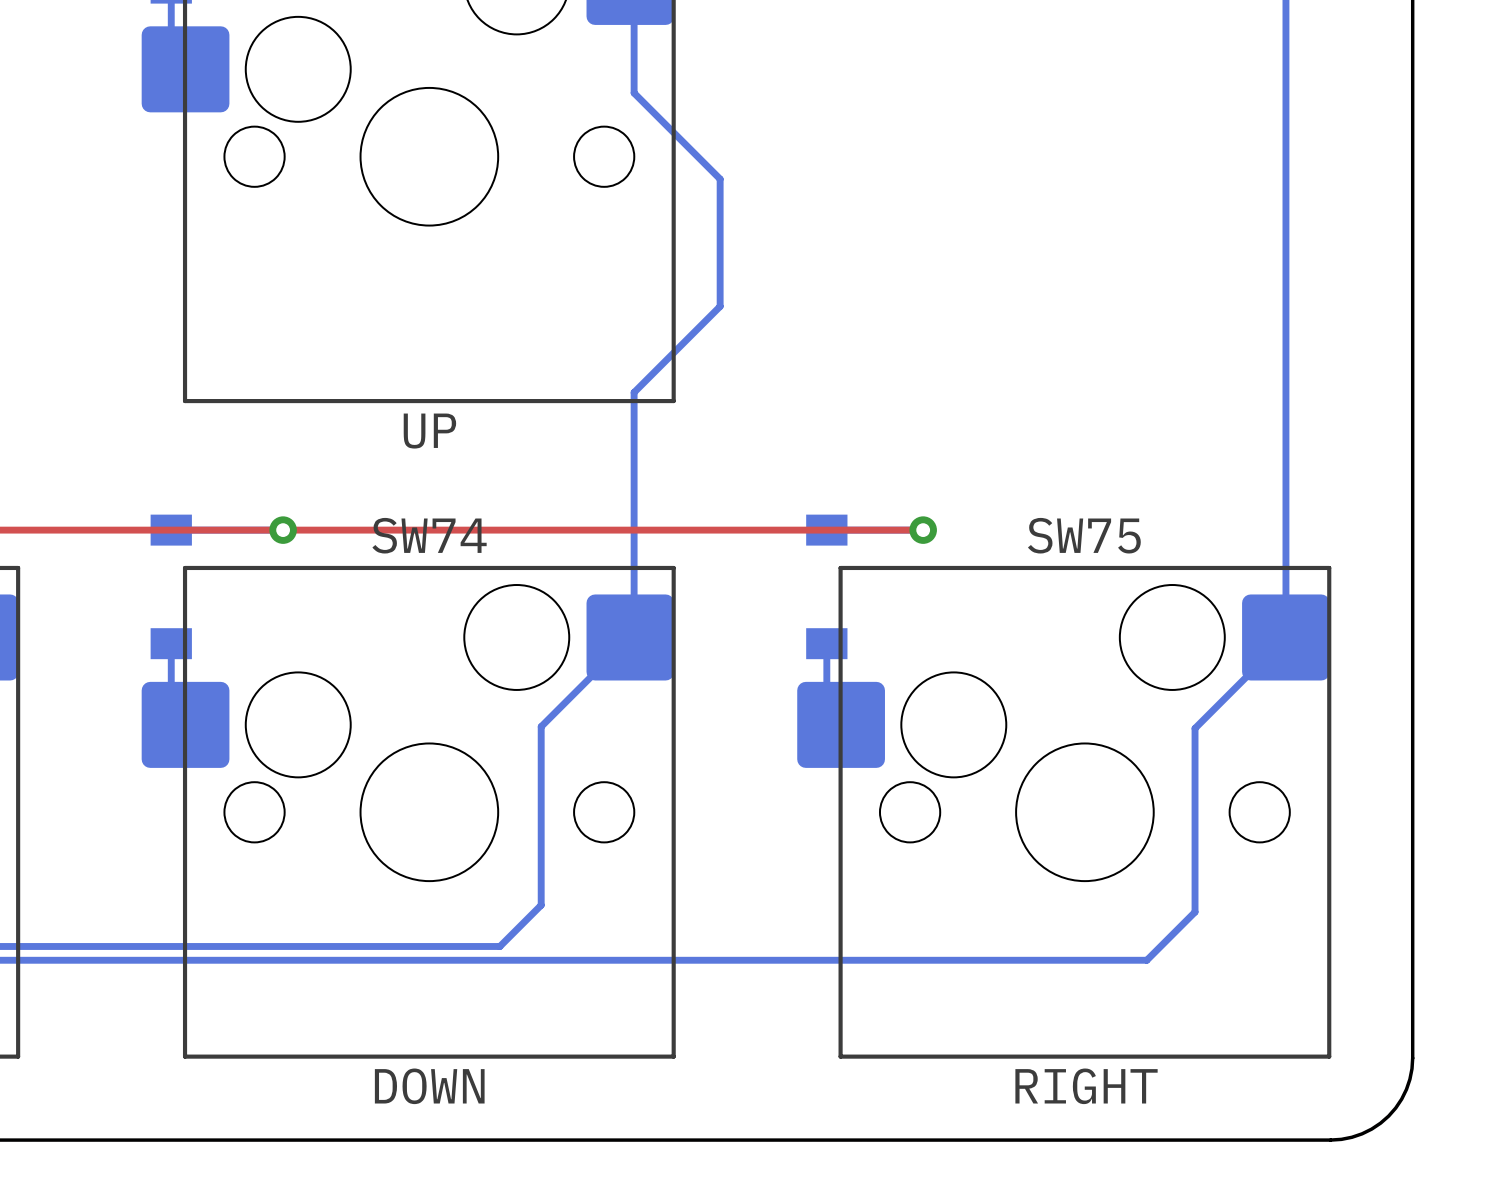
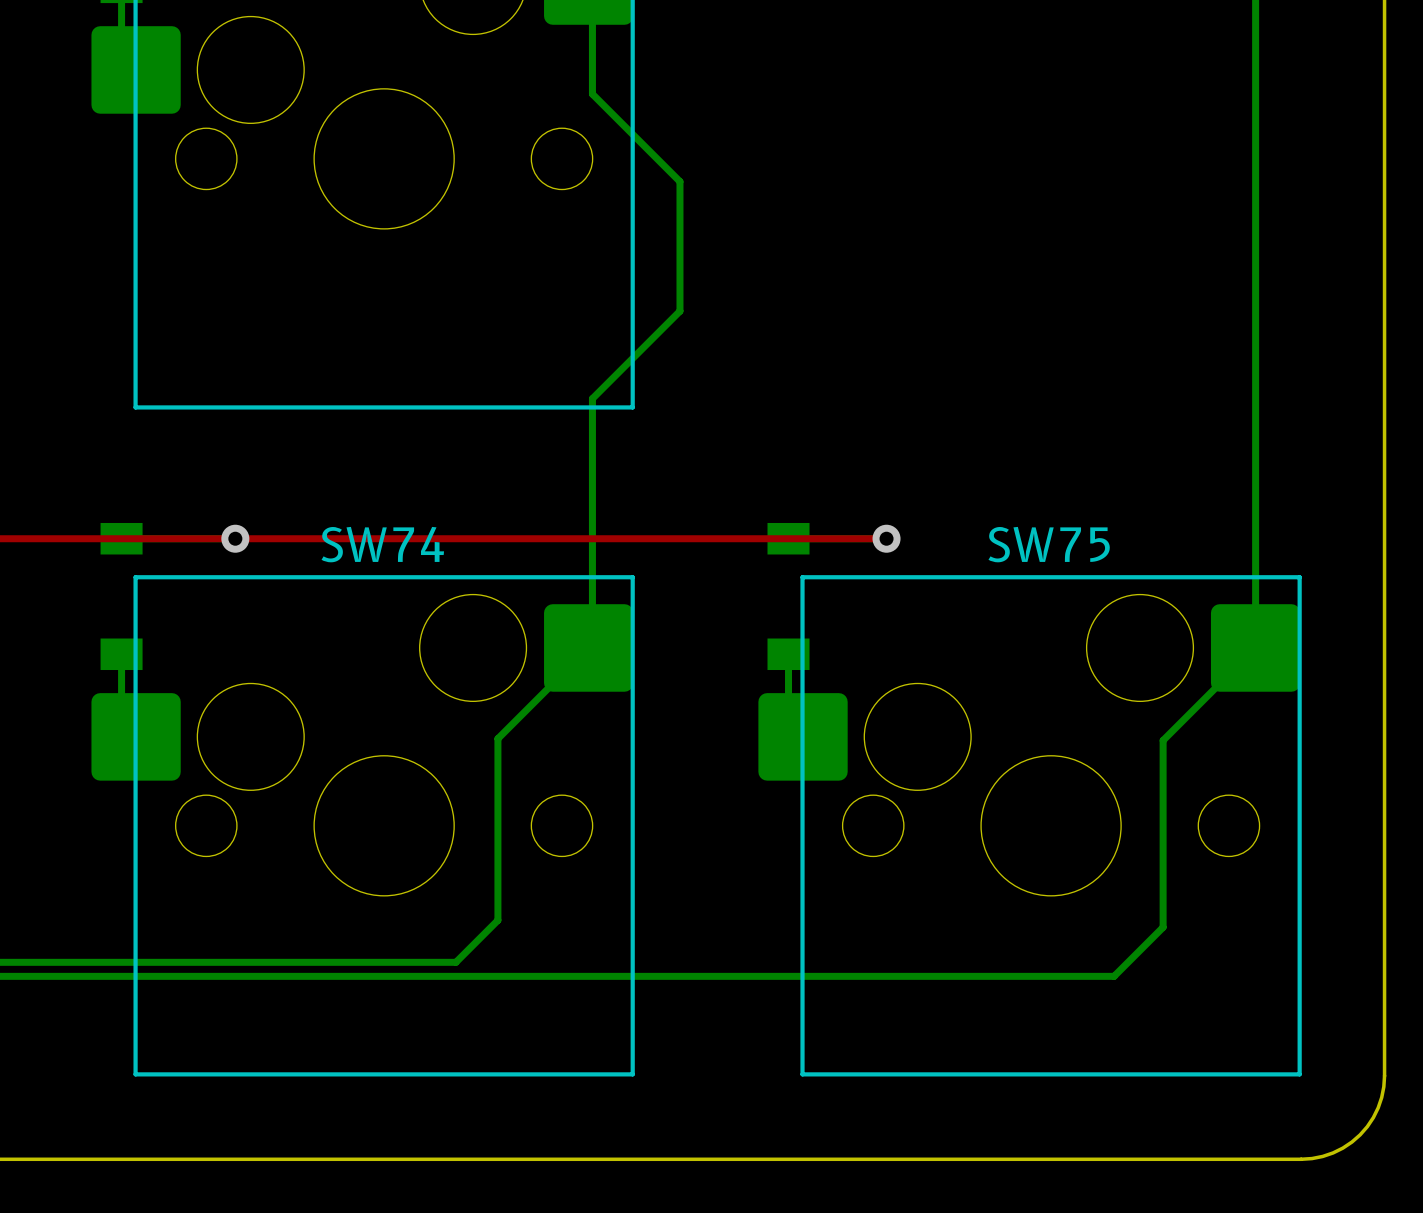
part value: UP (429, 431) -> none
SW74 value: DOWN (429, 1086) -> none
SW75 value: RIGHT (1086, 1086) -> none

